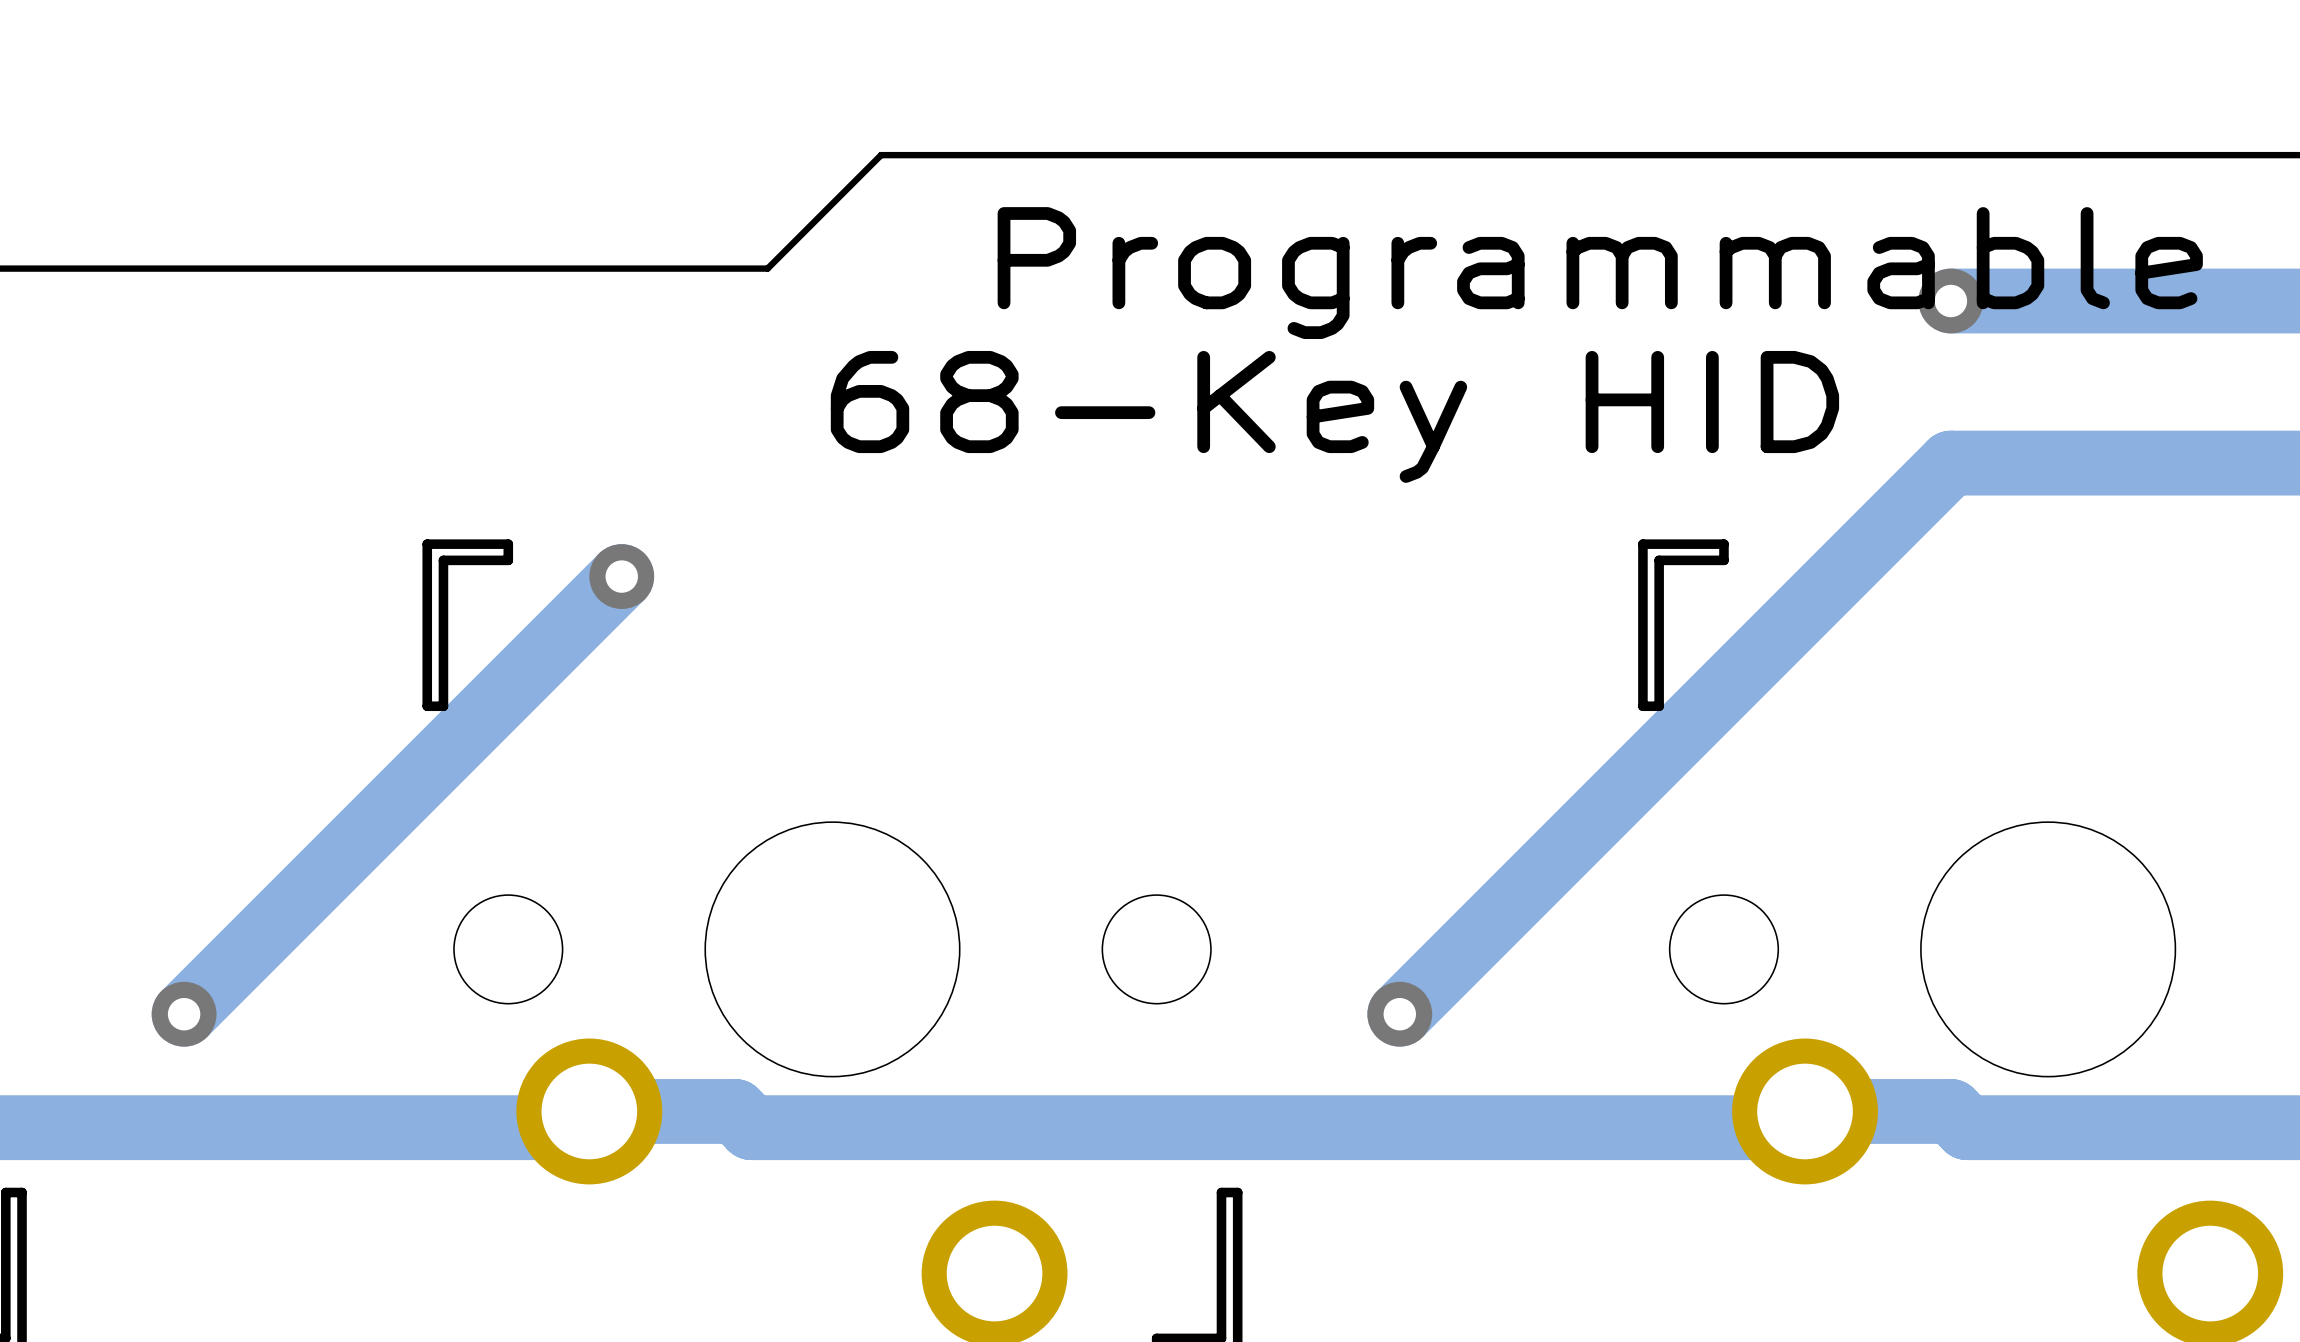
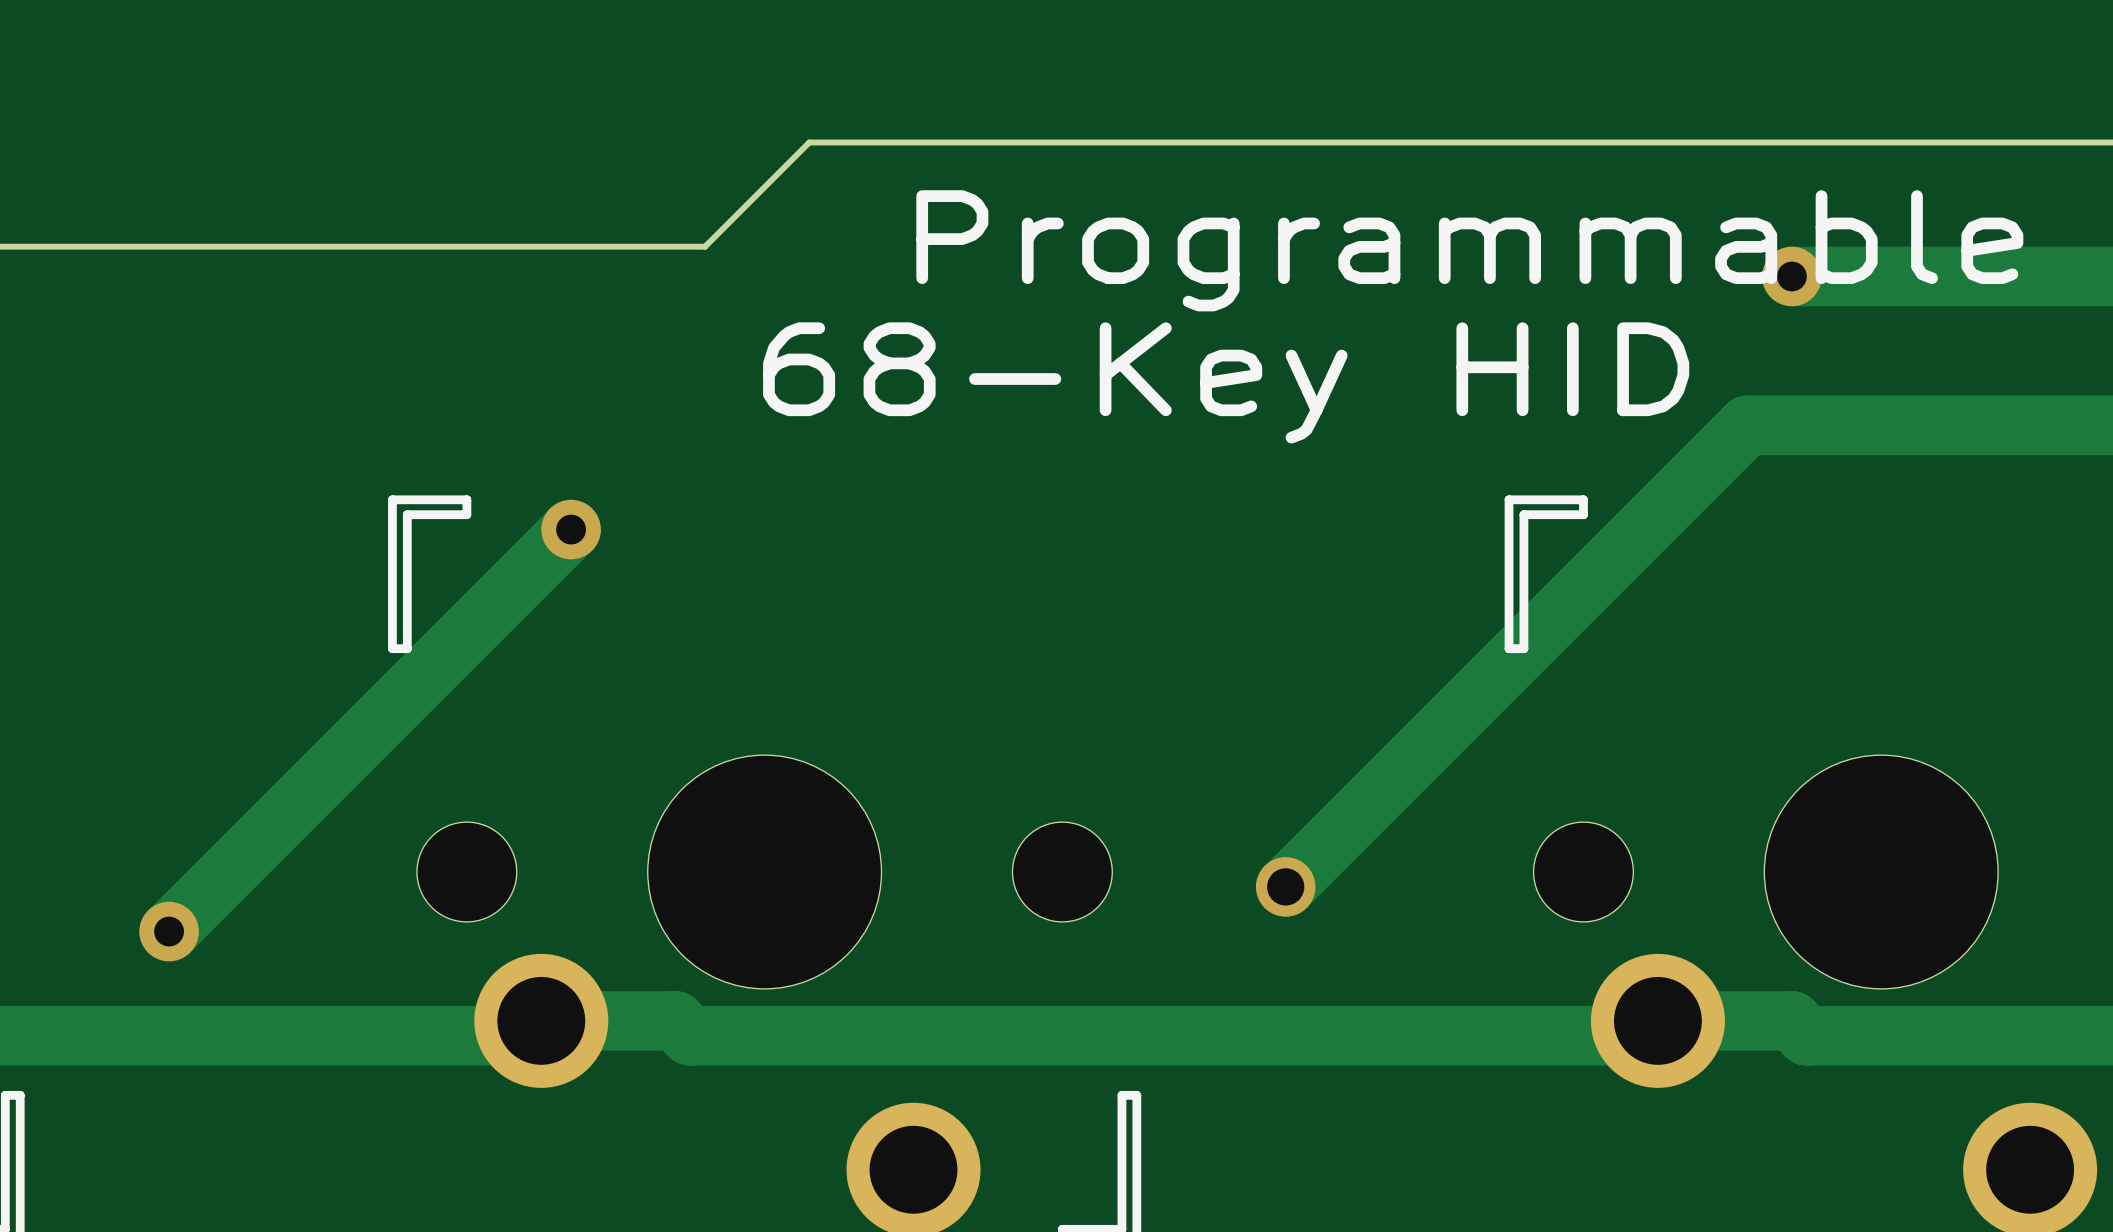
track: (1950, 463) (1399, 1014) -> (1791, 425) (1747, 425) (1285, 886)
via position: (1399, 1014) -> (1285, 886)

